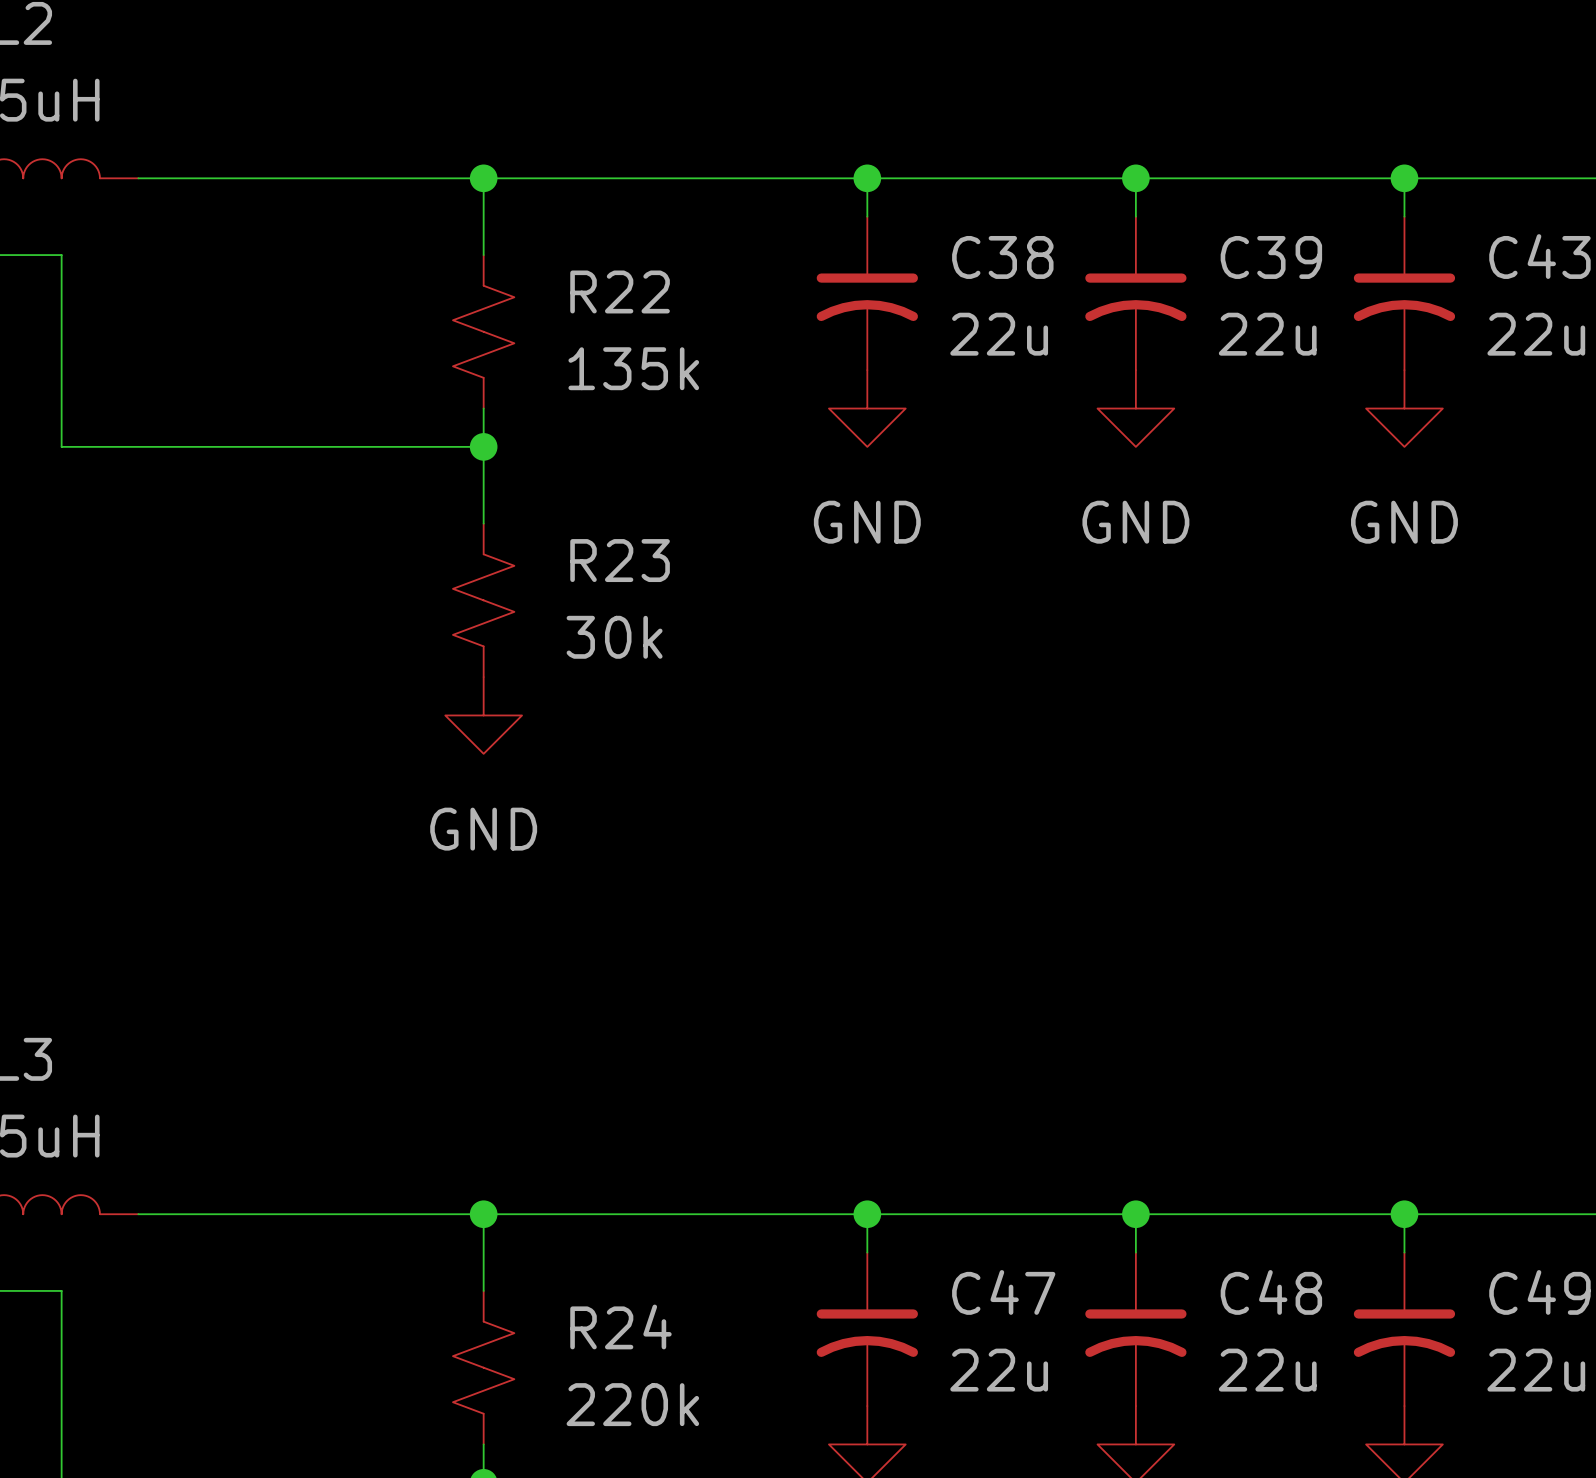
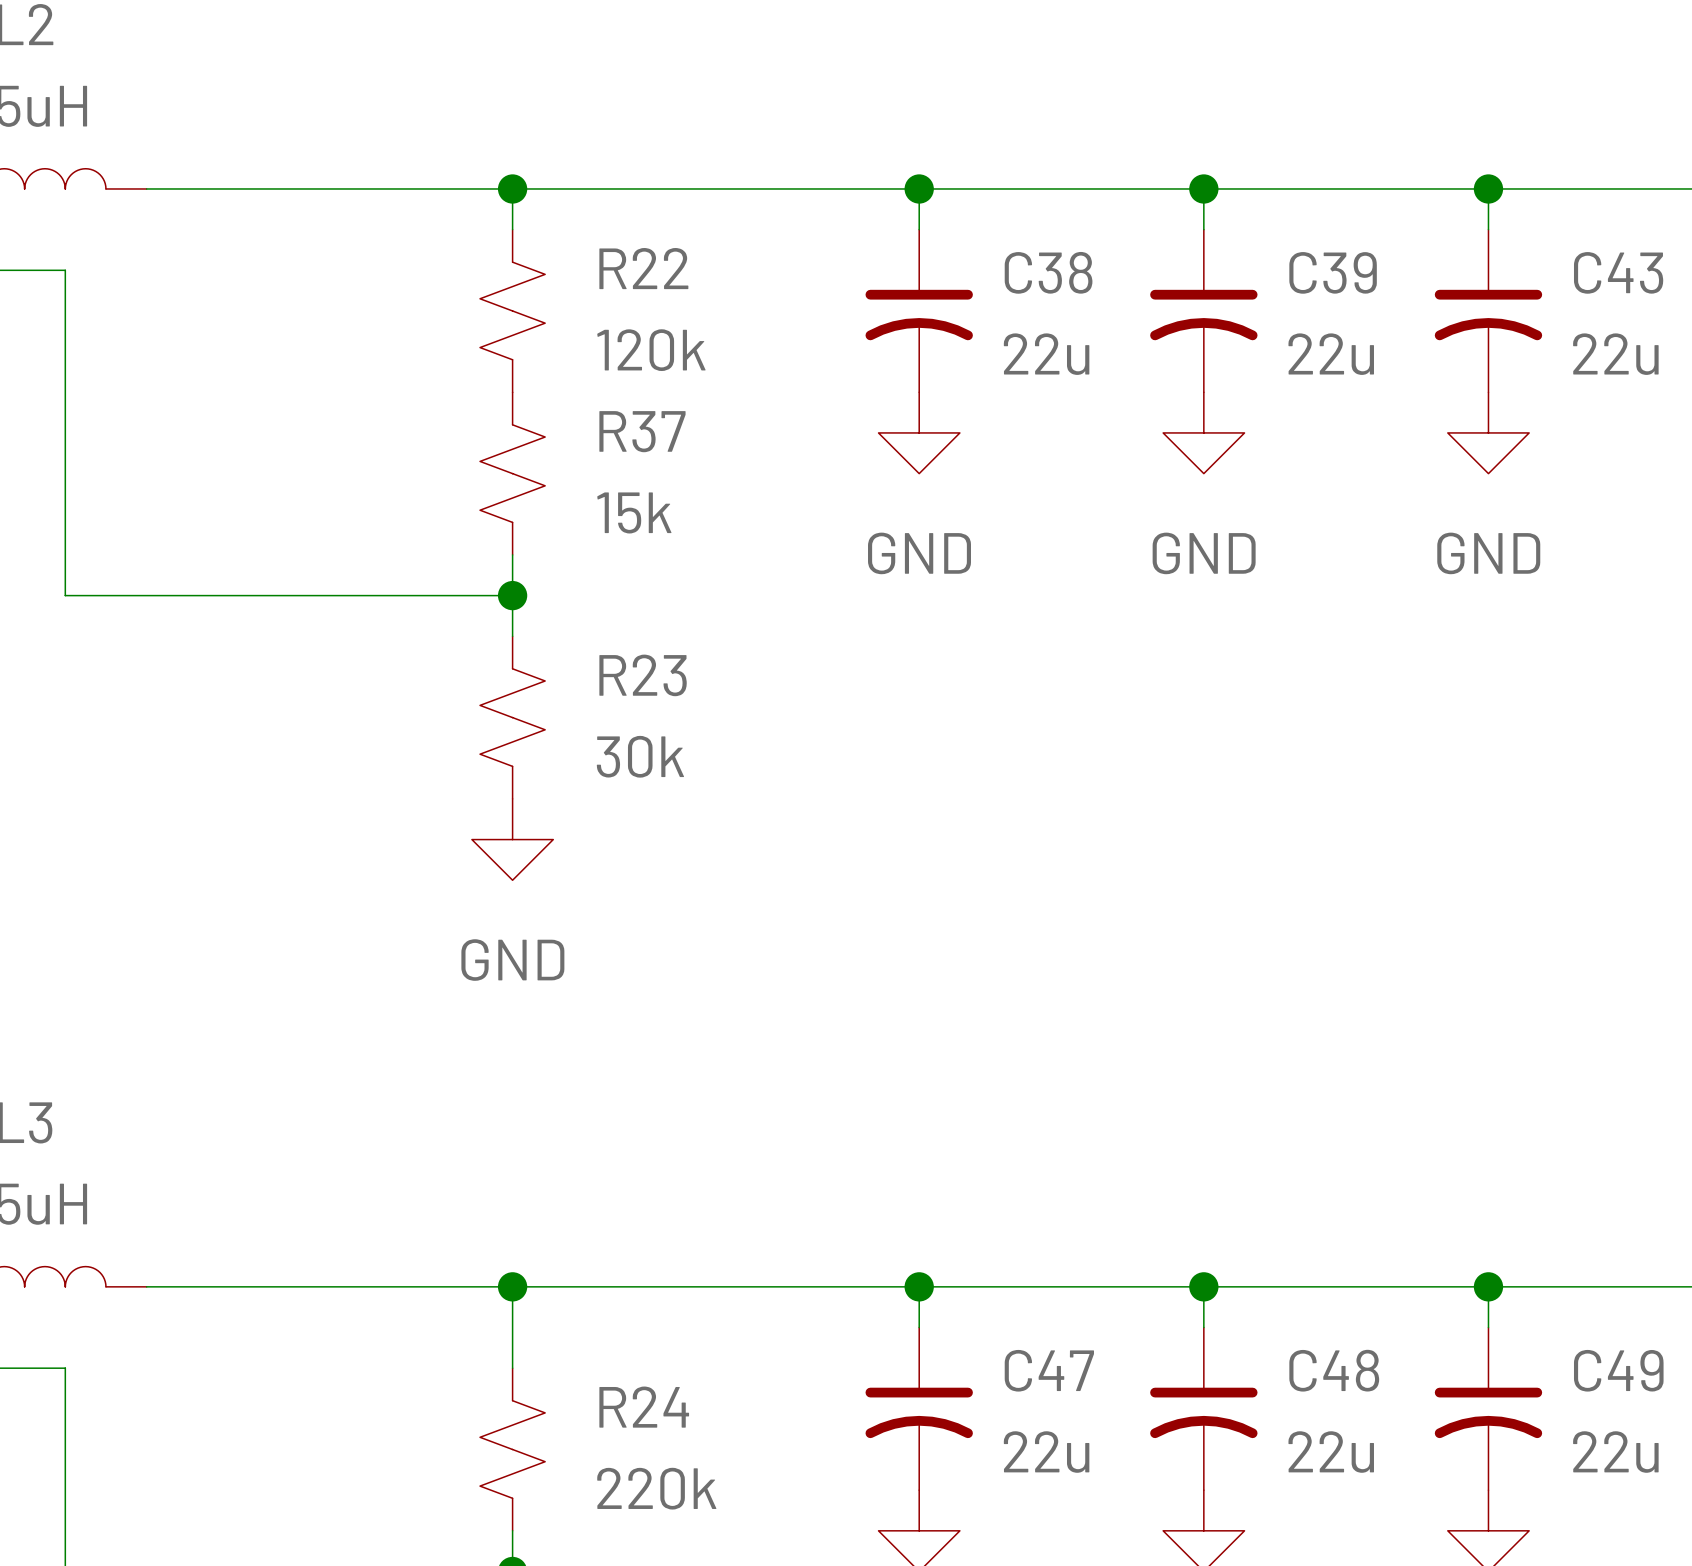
R22 position: (483, 331) -> (512, 310)
R22 value: 135k (633, 368) -> 120k (651, 350)
wire: (483, 408) (483, 523) -> (512, 636) (512, 554)
wire: (61, 446) (483, 446) -> (65, 473) (65, 595) (512, 595)
junction position: (483, 446) -> (512, 595)
R37: none -> 15k (512, 473)
R23 position: (483, 600) -> (512, 717)
power symbol position: GND (483, 715) -> GND (512, 839)

